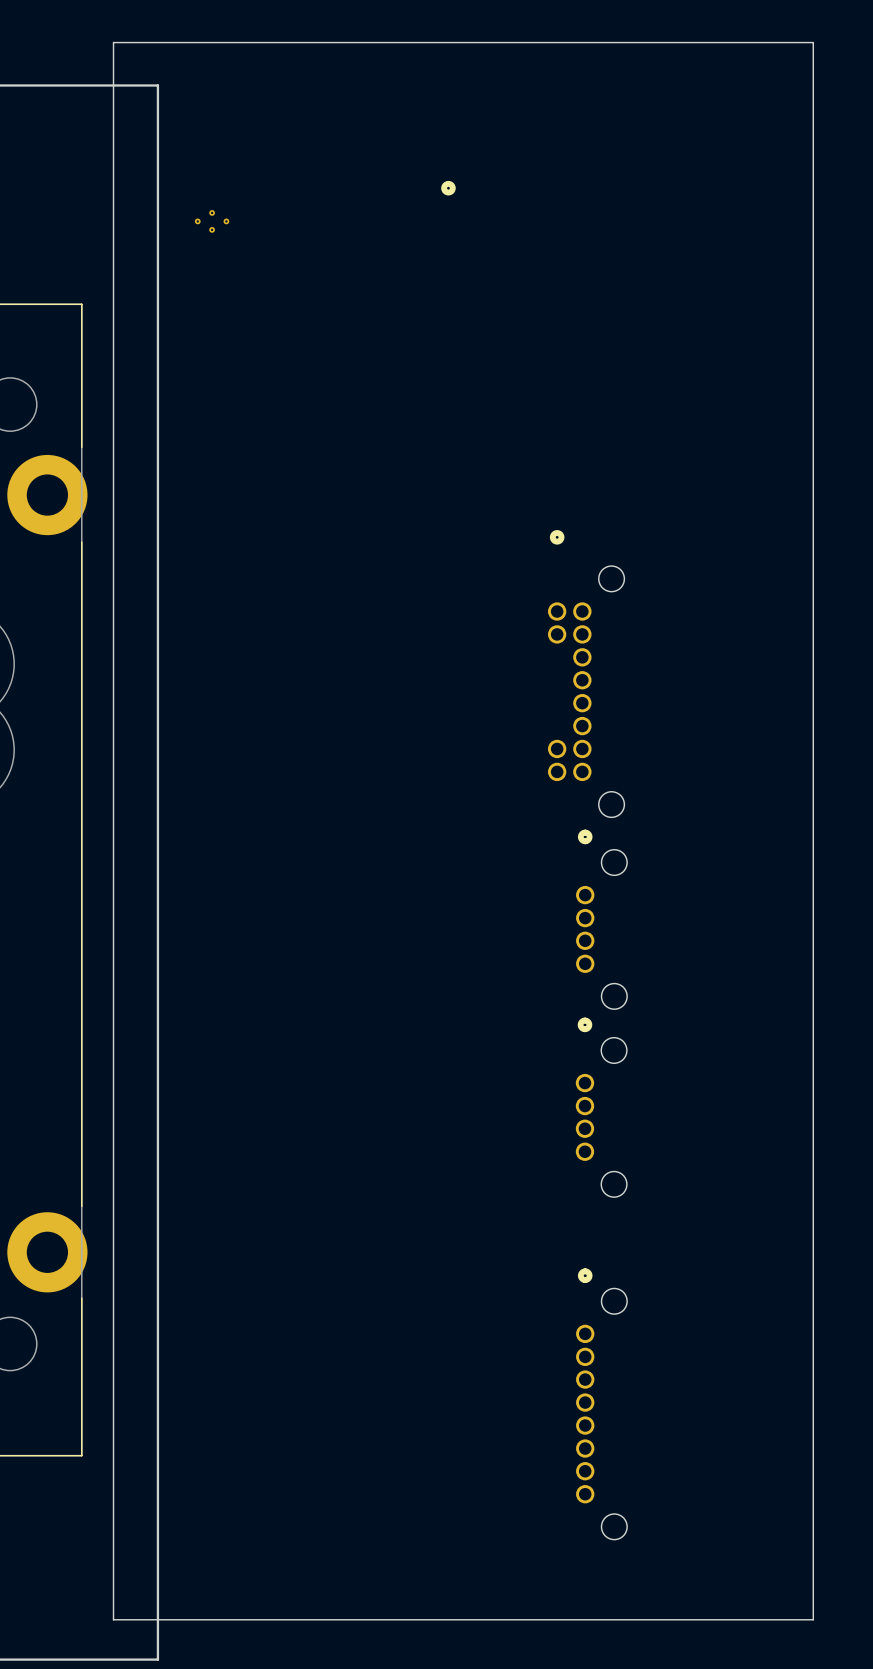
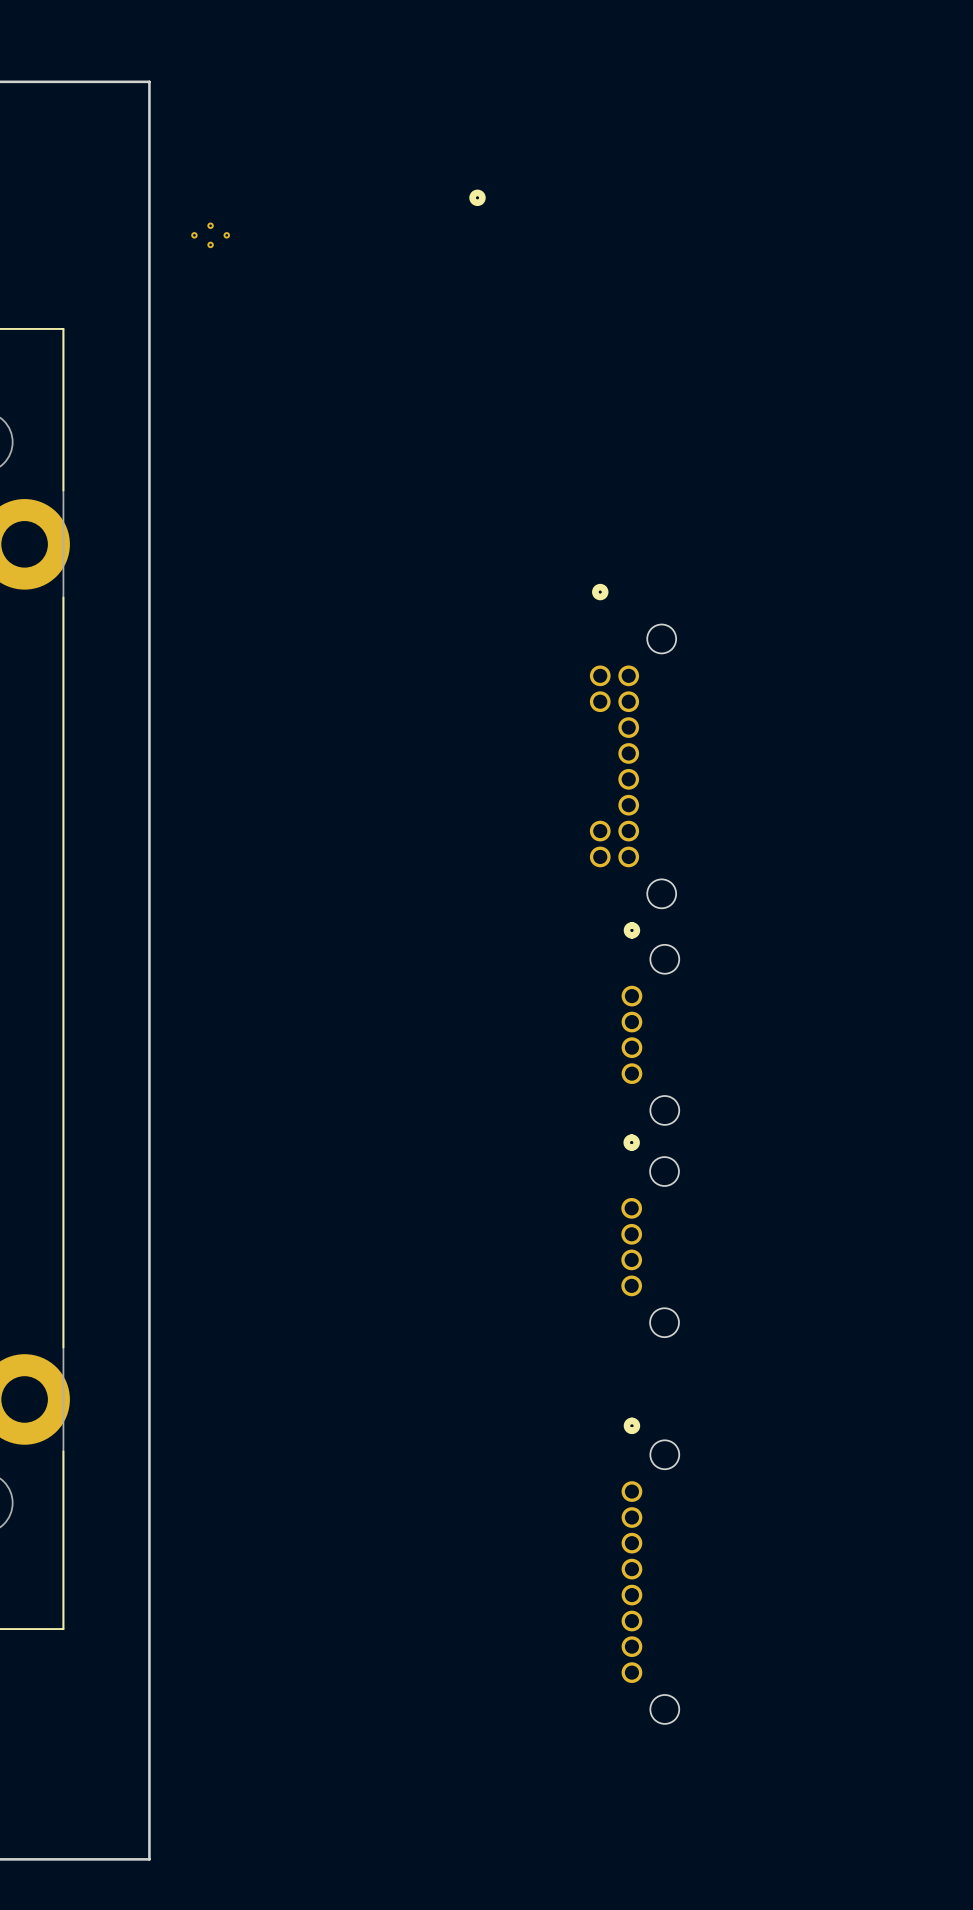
board edge: (813, 42) (113, 42) (113, 1619) (813, 1619) (813, 42) -> none

